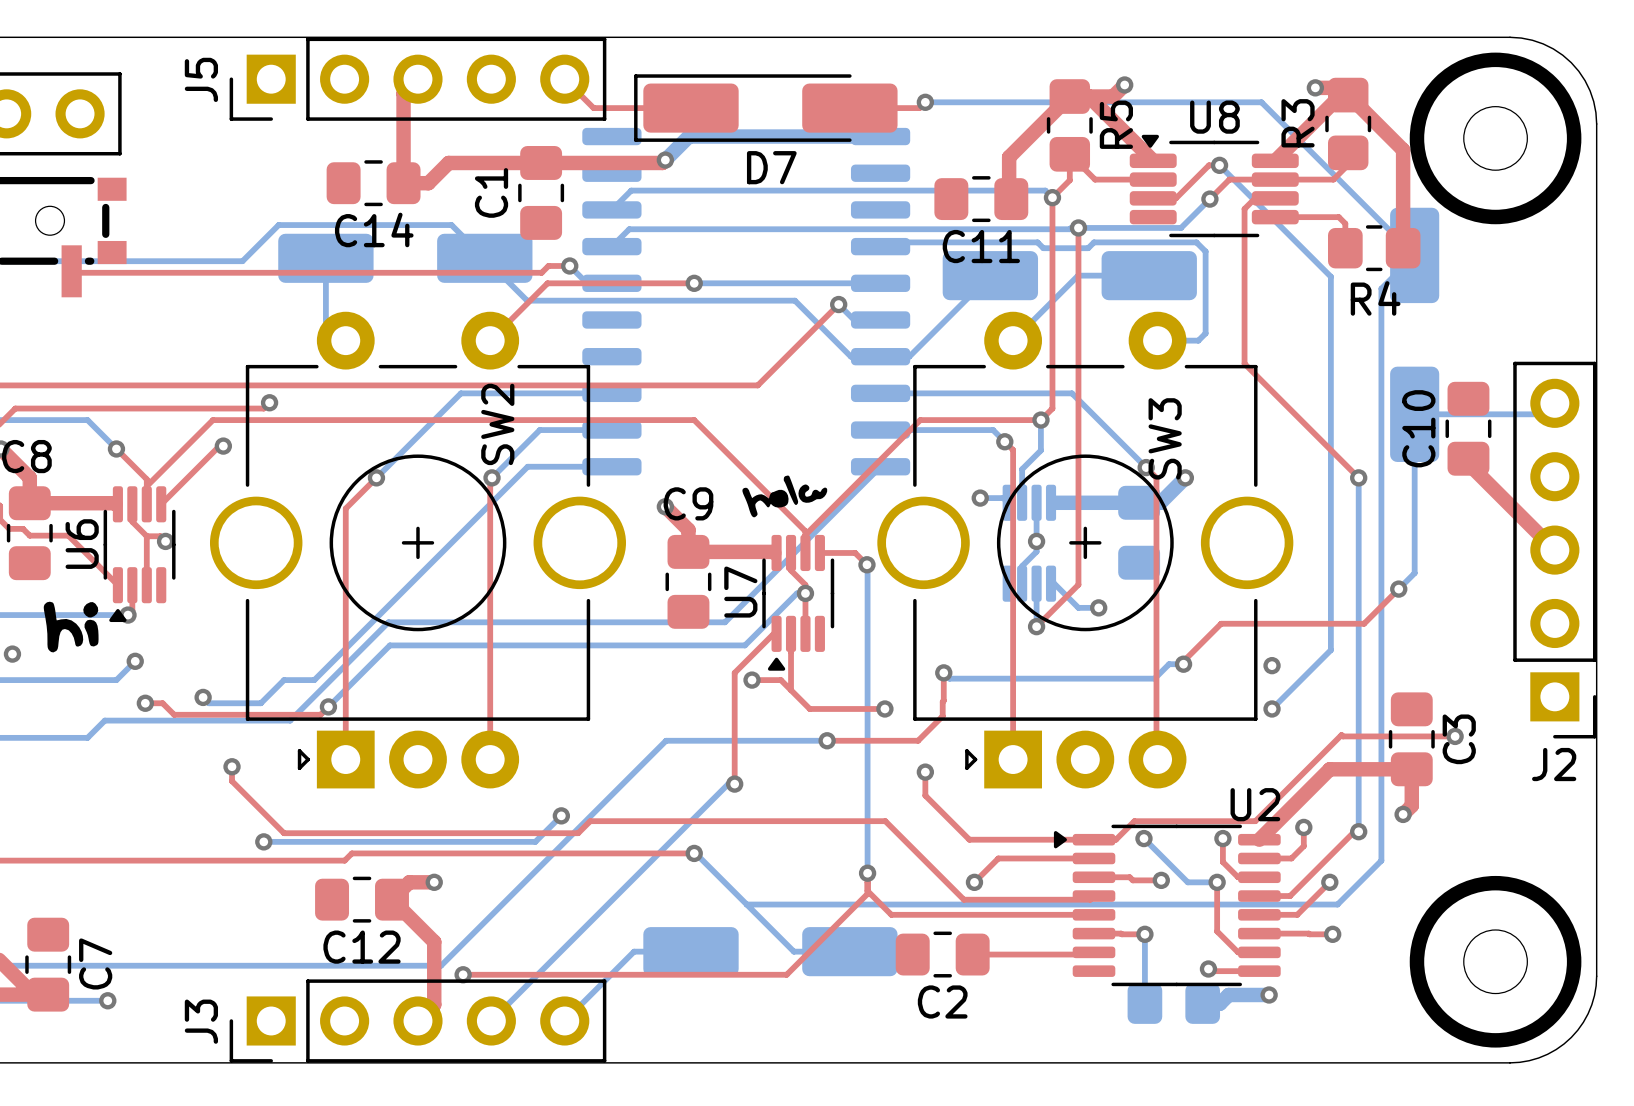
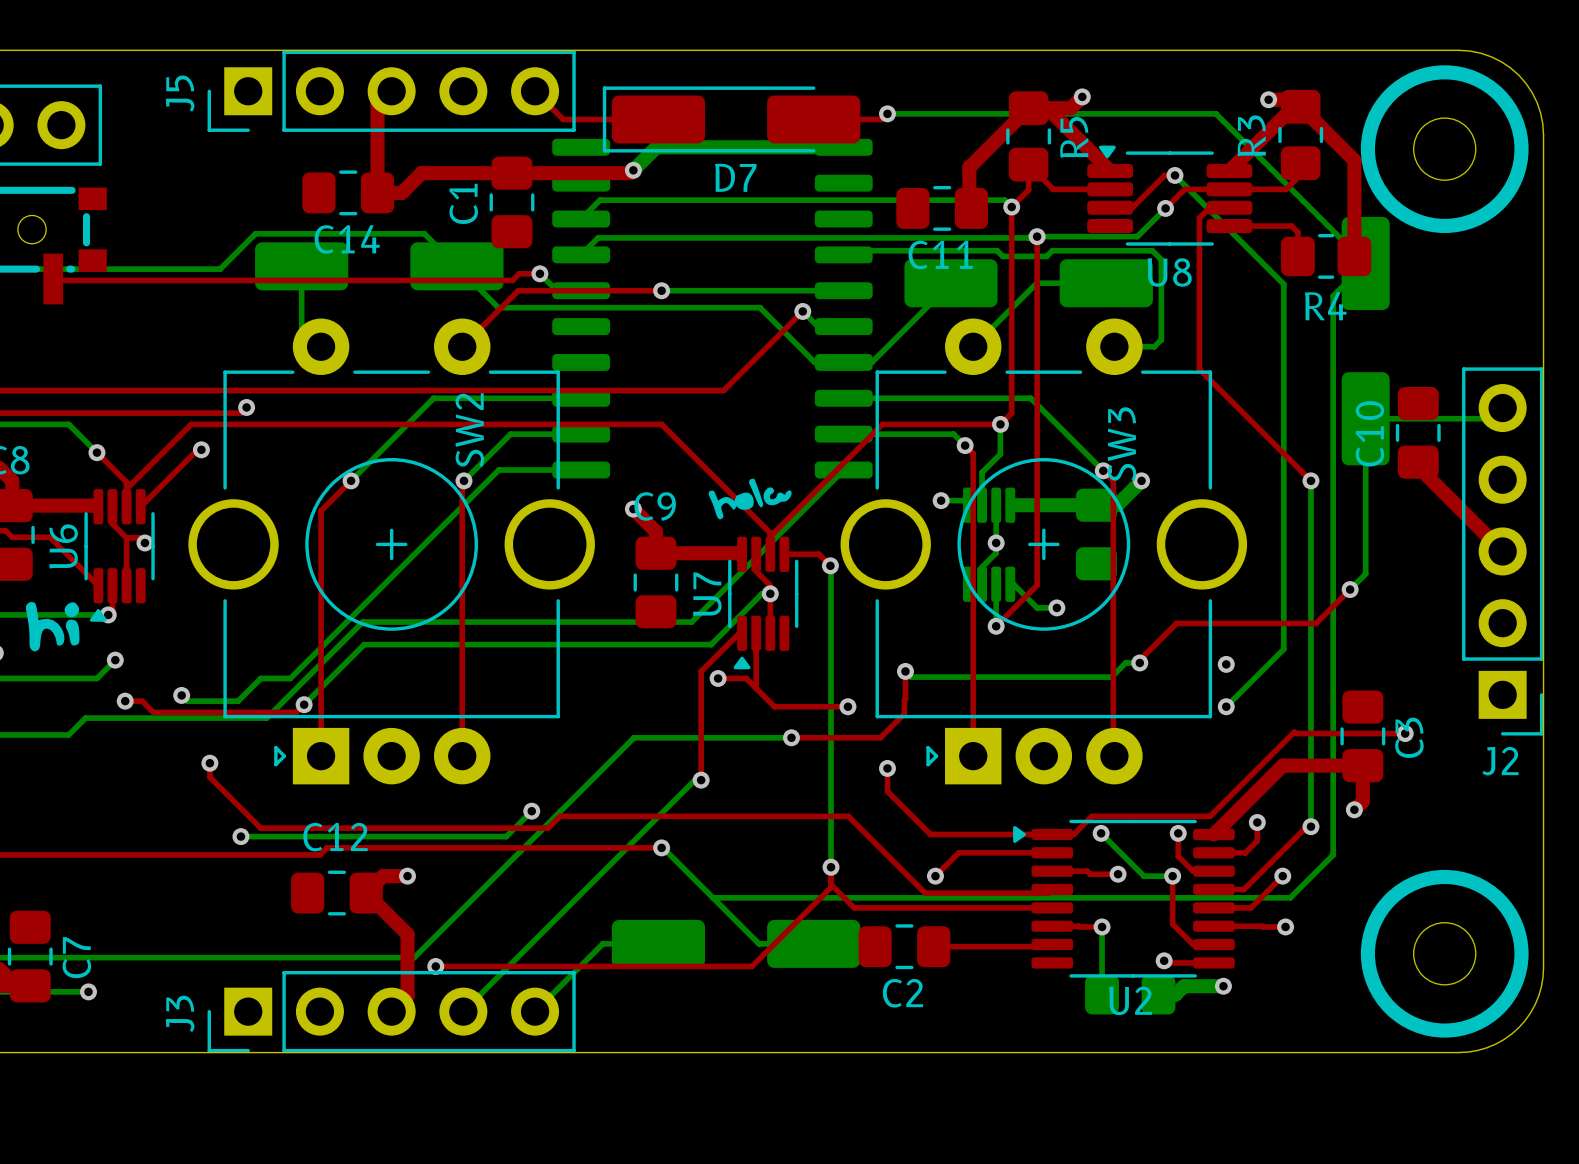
U8 name position: U8 (1214, 117) -> U8 (1169, 272)
U2 name position: U2 (1255, 804) -> U2 (1130, 1000)
C12 name position: C12 (362, 947) -> C12 (335, 837)

